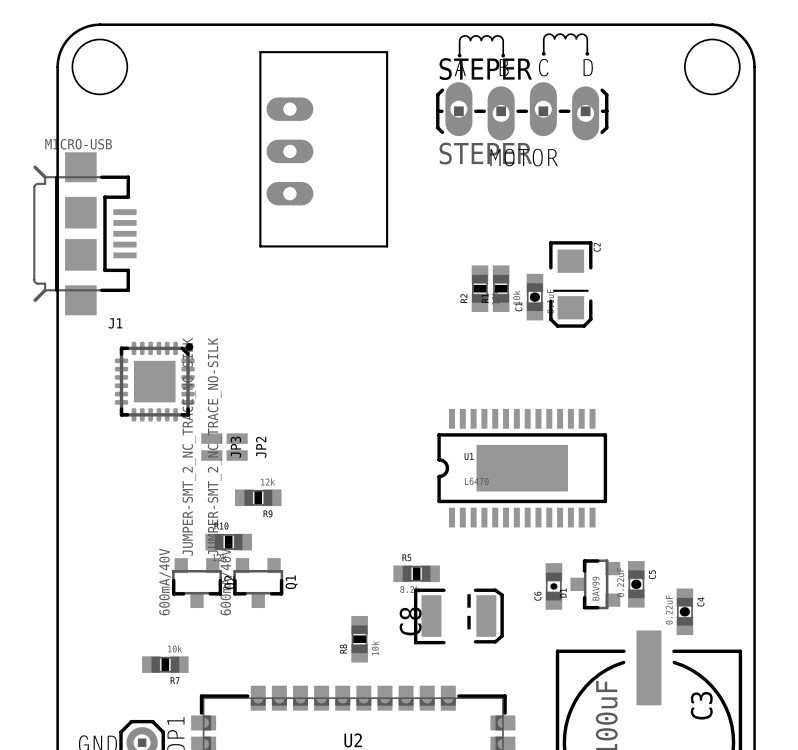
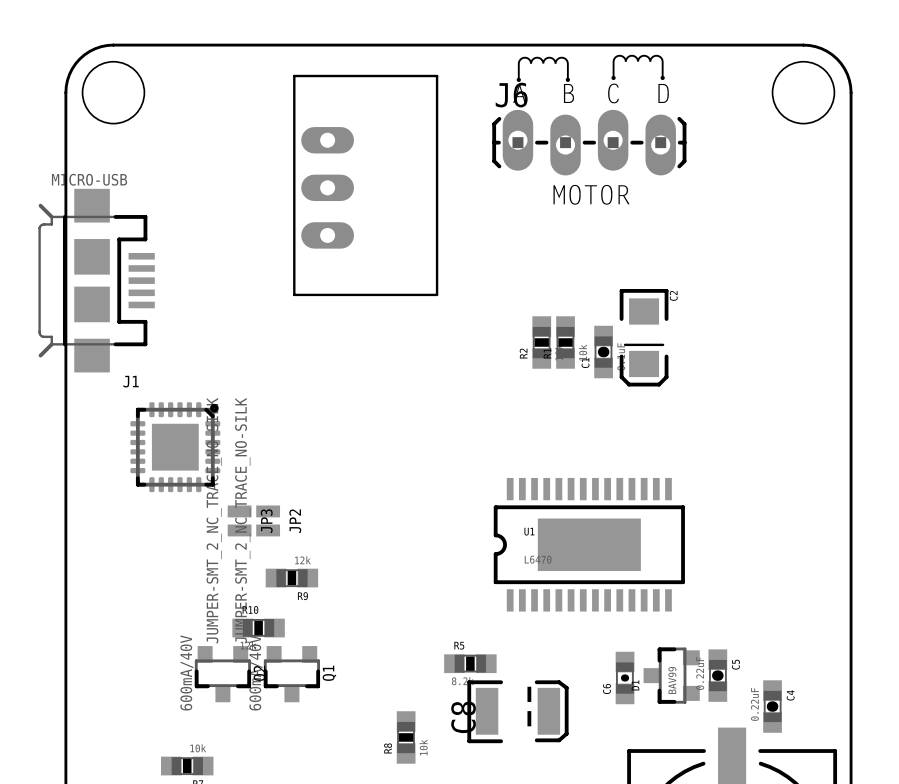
STEPER name: STEPER (485, 69) -> J6 (511, 95)
STEPER value: STEPER (485, 153) -> none

